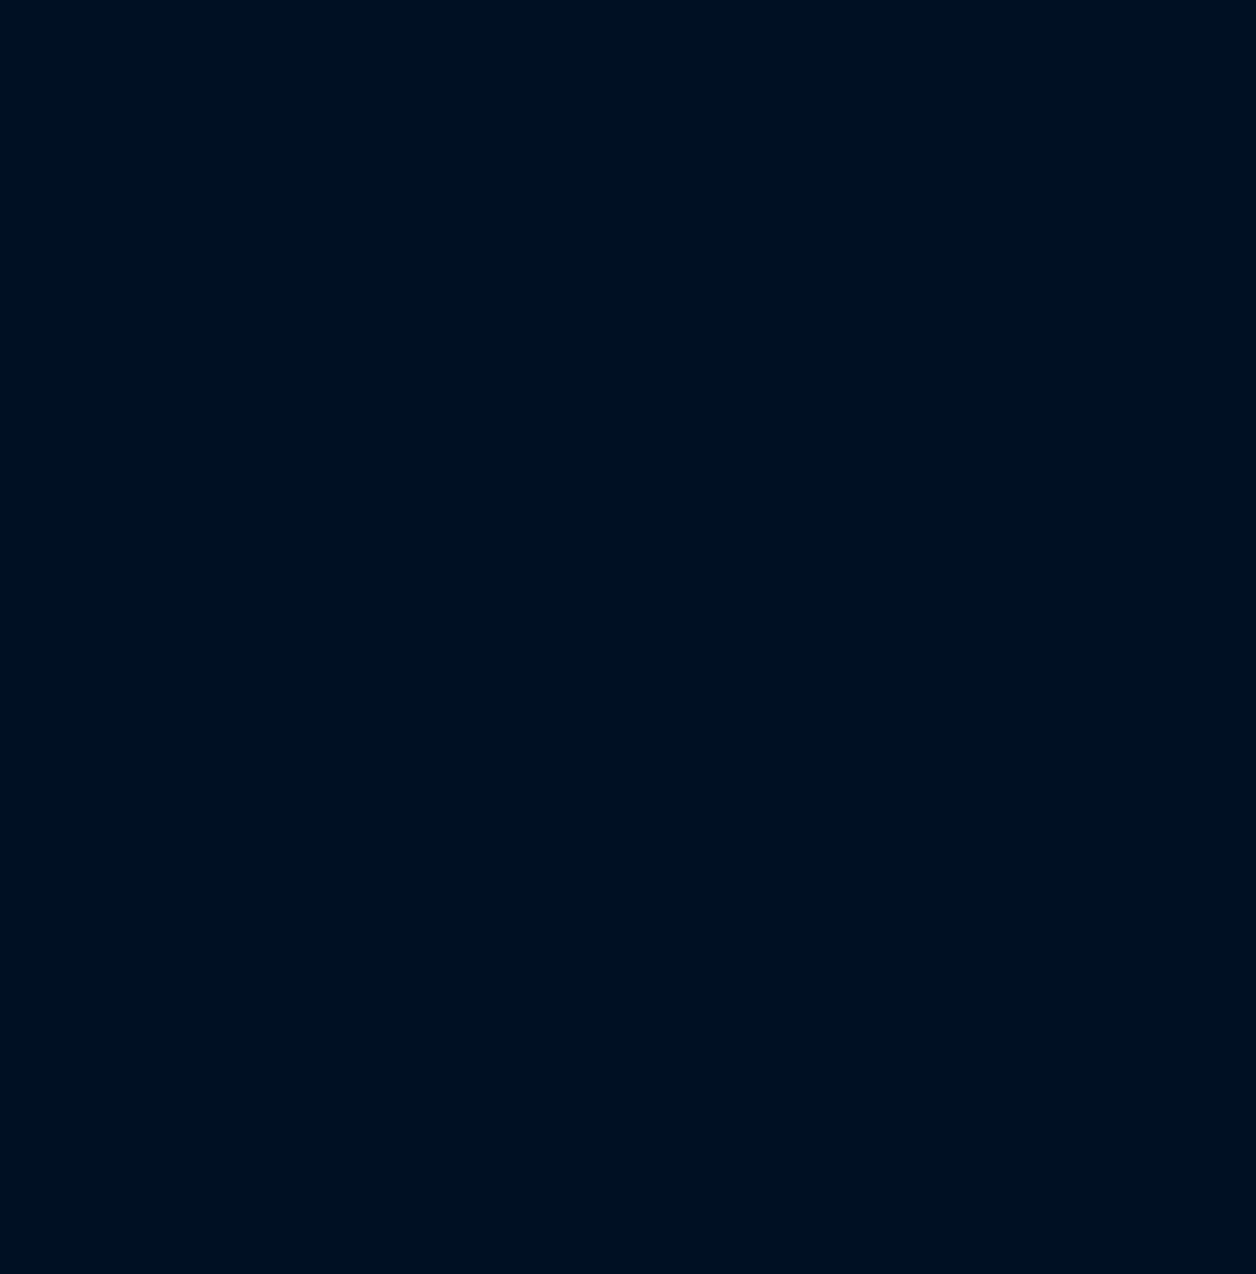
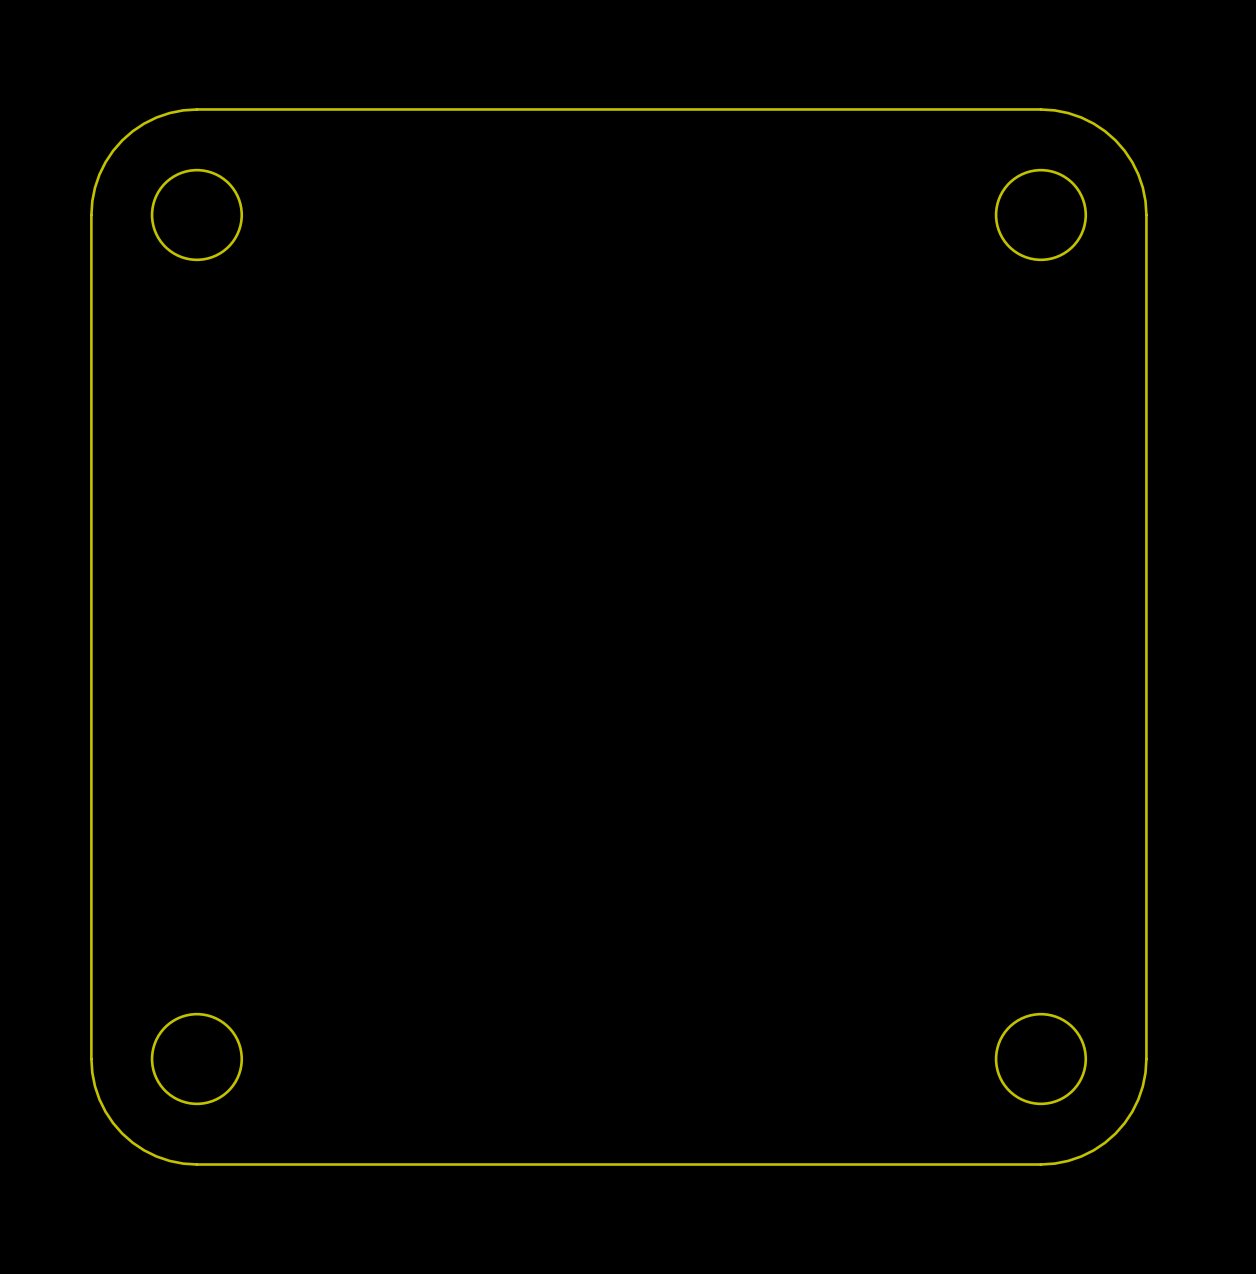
board edge: none -> (1040, 109) (196, 109) (169, 113) (156, 117) (132, 131) (122, 140) (113, 150) (99, 174) (94, 187) (91, 214) (91, 1059) (92, 1072) (99, 1099) (113, 1123) (122, 1133) (132, 1142) (156, 1156) (169, 1160) (196, 1164) (1040, 1164) (1054, 1163) (1081, 1156) (1105, 1142) (1115, 1133) (1132, 1111) (1138, 1099) (1145, 1072) (1146, 1059) (1145, 201) (1138, 174) (1132, 162) (1115, 140) (1105, 131) (1081, 117) (1068, 113) (1040, 109)
round board edge: none -> [150, 168, 244, 262]
round board edge: none -> [994, 168, 1088, 262]
round board edge: none -> [150, 1012, 244, 1106]
round board edge: none -> [994, 1012, 1088, 1106]

